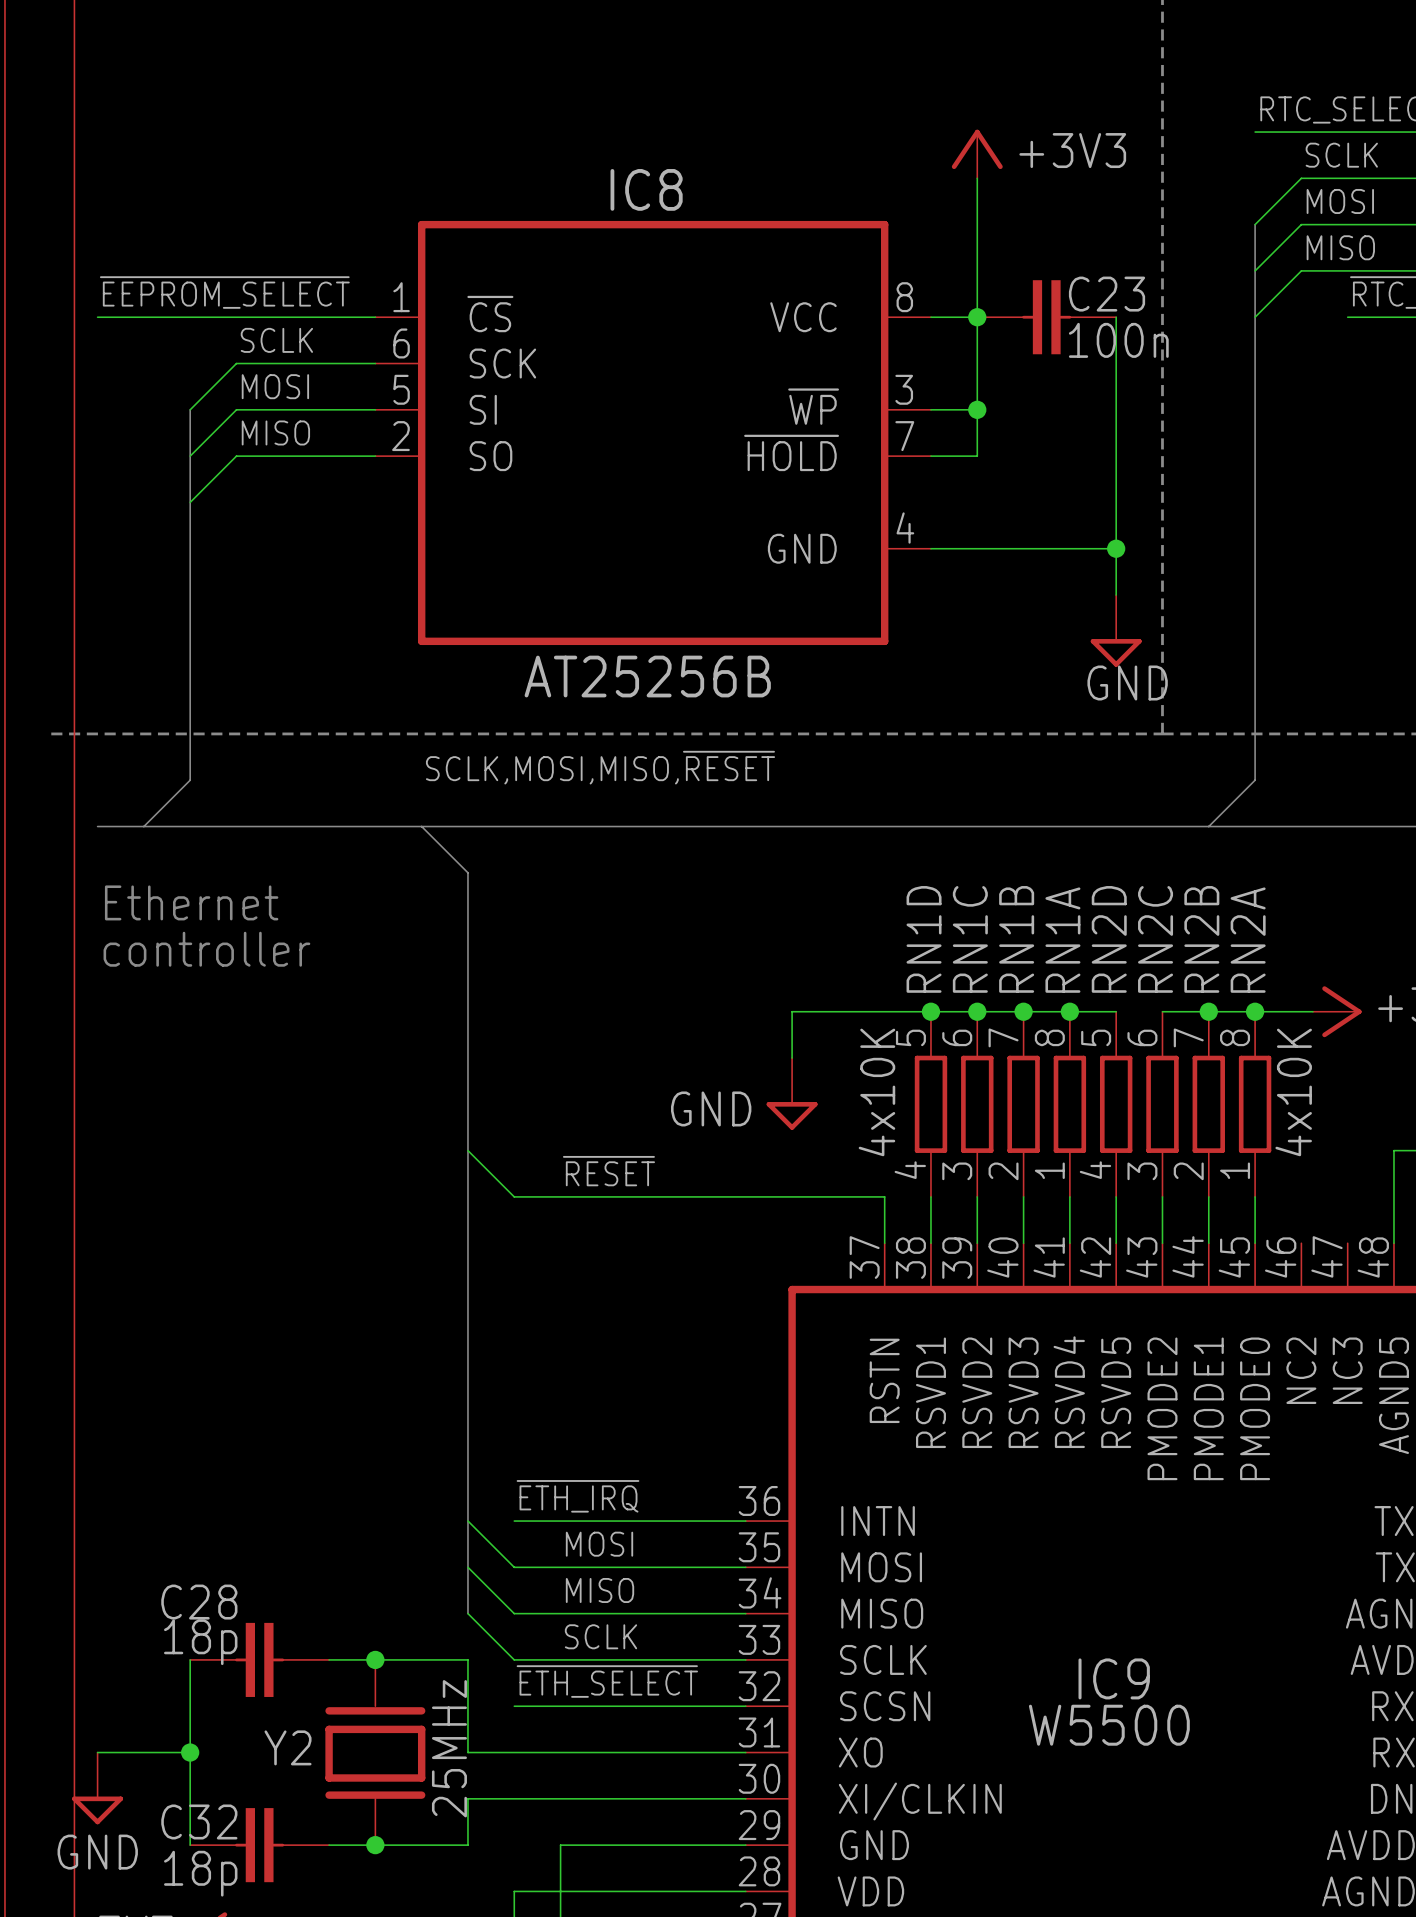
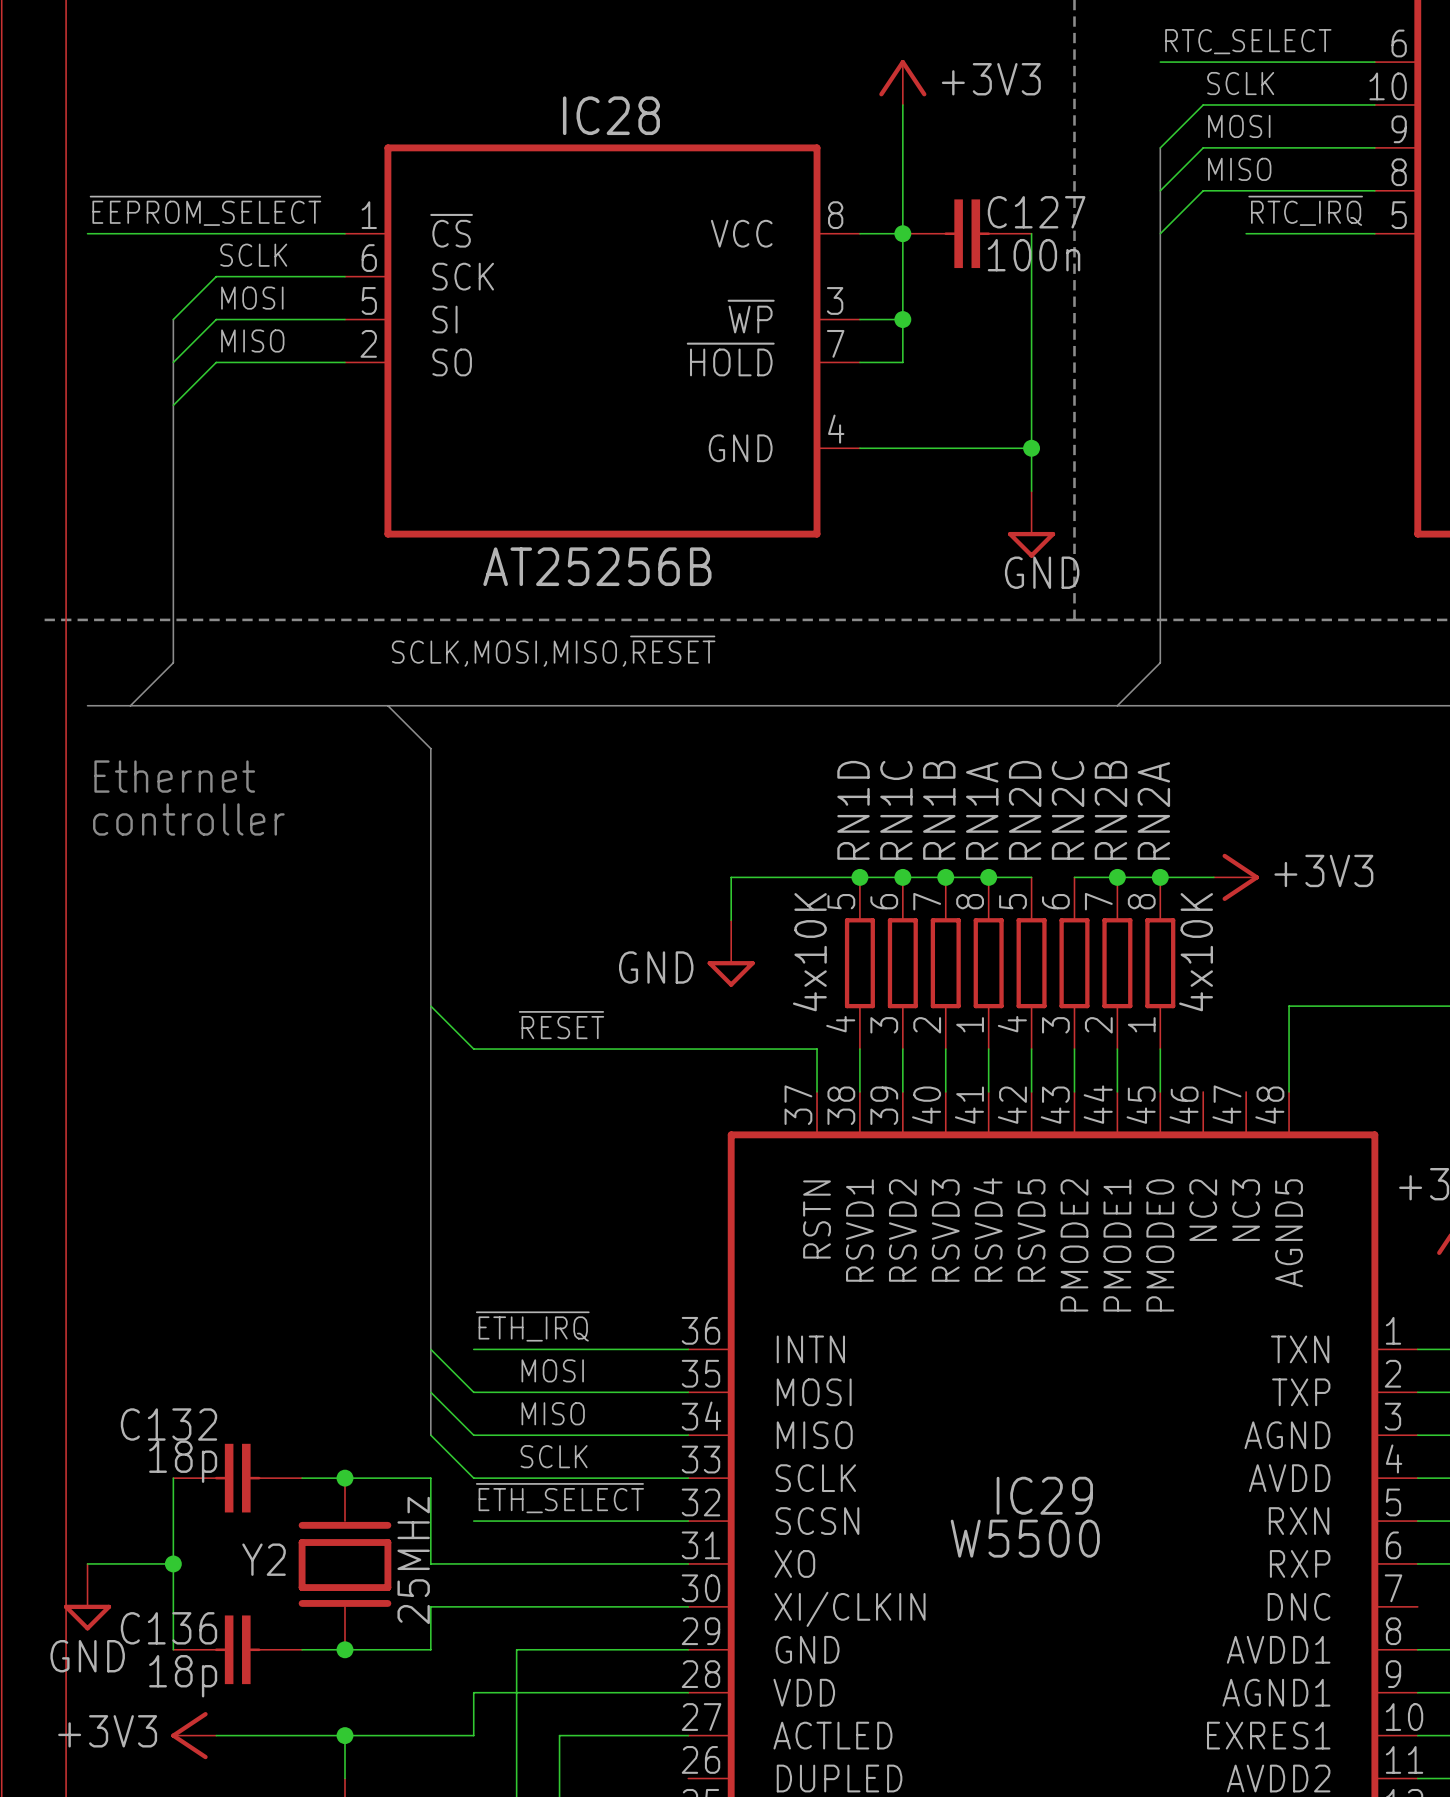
IC8 name: IC8 (646, 189) -> IC28 (611, 115)
C23 name: C23 (1107, 294) -> C127 (1036, 212)
C28 name: C28 (199, 1602) -> C132 (168, 1424)
IC9 name: IC9 (1114, 1678) -> IC29 (1044, 1495)
C32 name: C32 (199, 1821) -> C136 (168, 1628)

